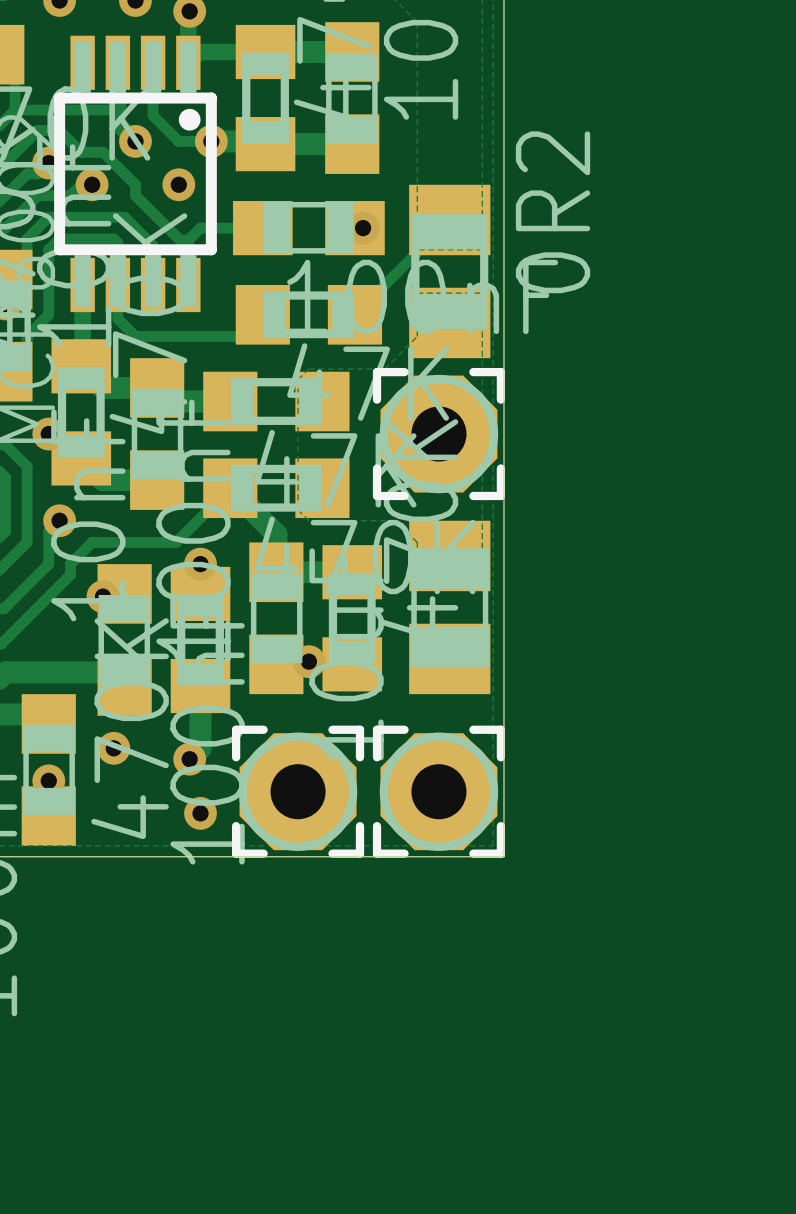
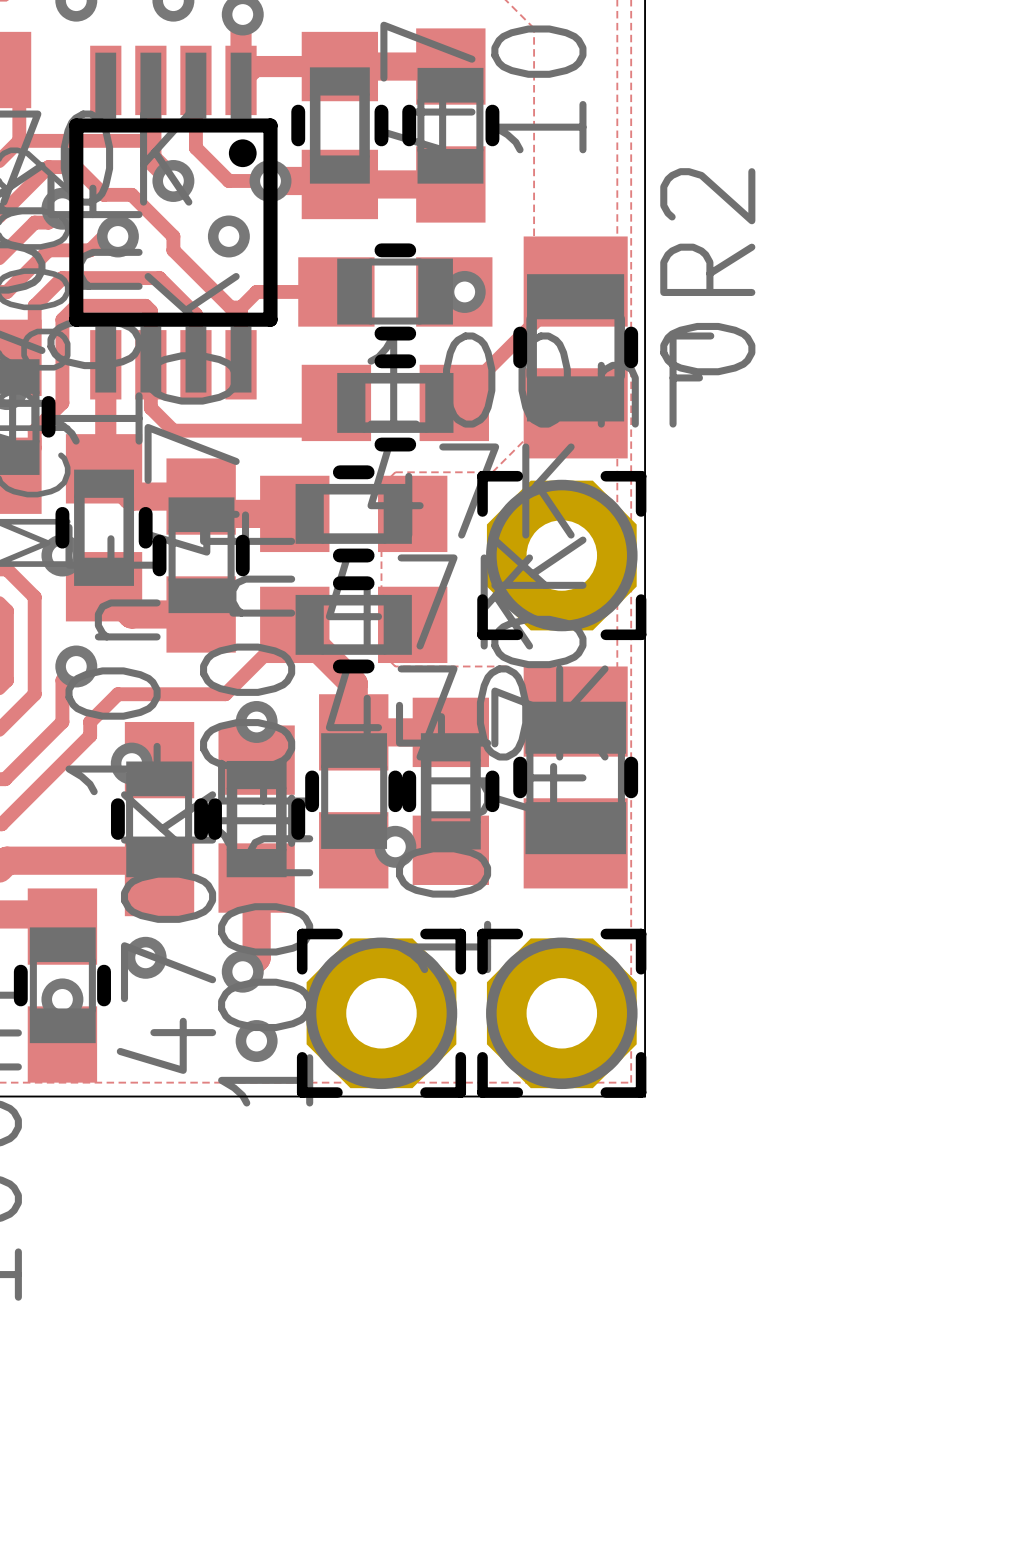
line: none -> (298, 111) (298, 139)
line: none -> (381, 111) (381, 139)
line: none -> (409, 111) (409, 139)
line: none -> (492, 111) (492, 139)
line: none -> (381, 250) (409, 250)
line: none -> (381, 333) (409, 333)
line: none -> (520, 333) (520, 361)
line: none -> (631, 333) (631, 361)
line: none -> (381, 361) (409, 361)
line: none -> (48, 402) (48, 430)
line: none -> (381, 444) (409, 444)
line: none -> (339, 472) (367, 472)
line: none -> (62, 513) (62, 541)
line: none -> (145, 513) (145, 541)
line: none -> (159, 541) (159, 569)
line: none -> (242, 541) (242, 569)
line: none -> (339, 555) (367, 555)
line: none -> (339, 583) (367, 583)
line: none -> (339, 666) (367, 666)
line: none -> (520, 763) (520, 791)
line: none -> (631, 763) (631, 791)
line: none -> (312, 777) (312, 805)
line: none -> (395, 777) (395, 805)
line: none -> (409, 777) (409, 805)
line: none -> (492, 777) (492, 805)
line: none -> (117, 805) (117, 832)
line: none -> (201, 805) (201, 832)
line: none -> (215, 805) (215, 832)
line: none -> (298, 805) (298, 832)
line: none -> (20, 971) (20, 999)
line: none -> (104, 971) (104, 999)

